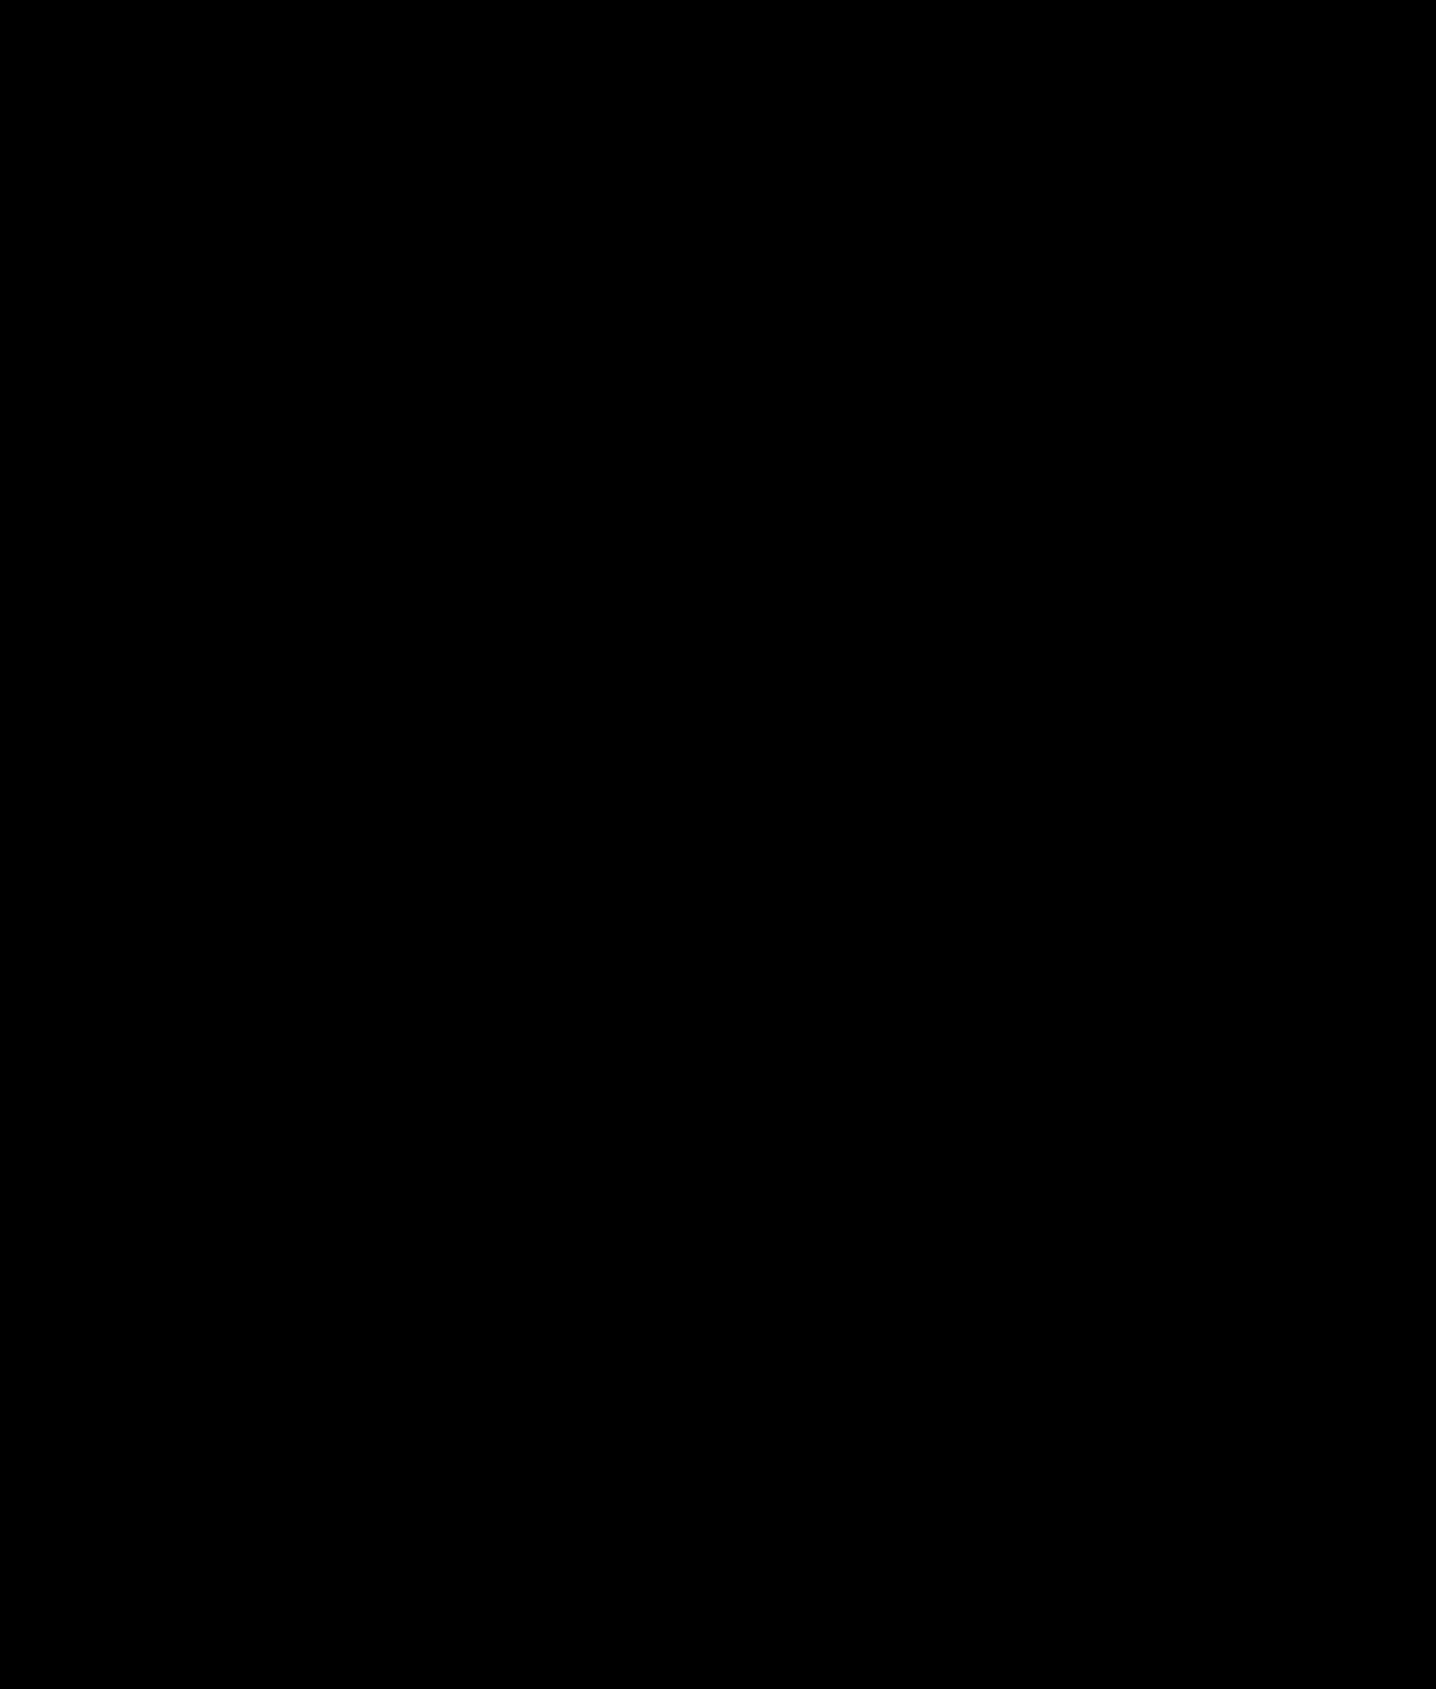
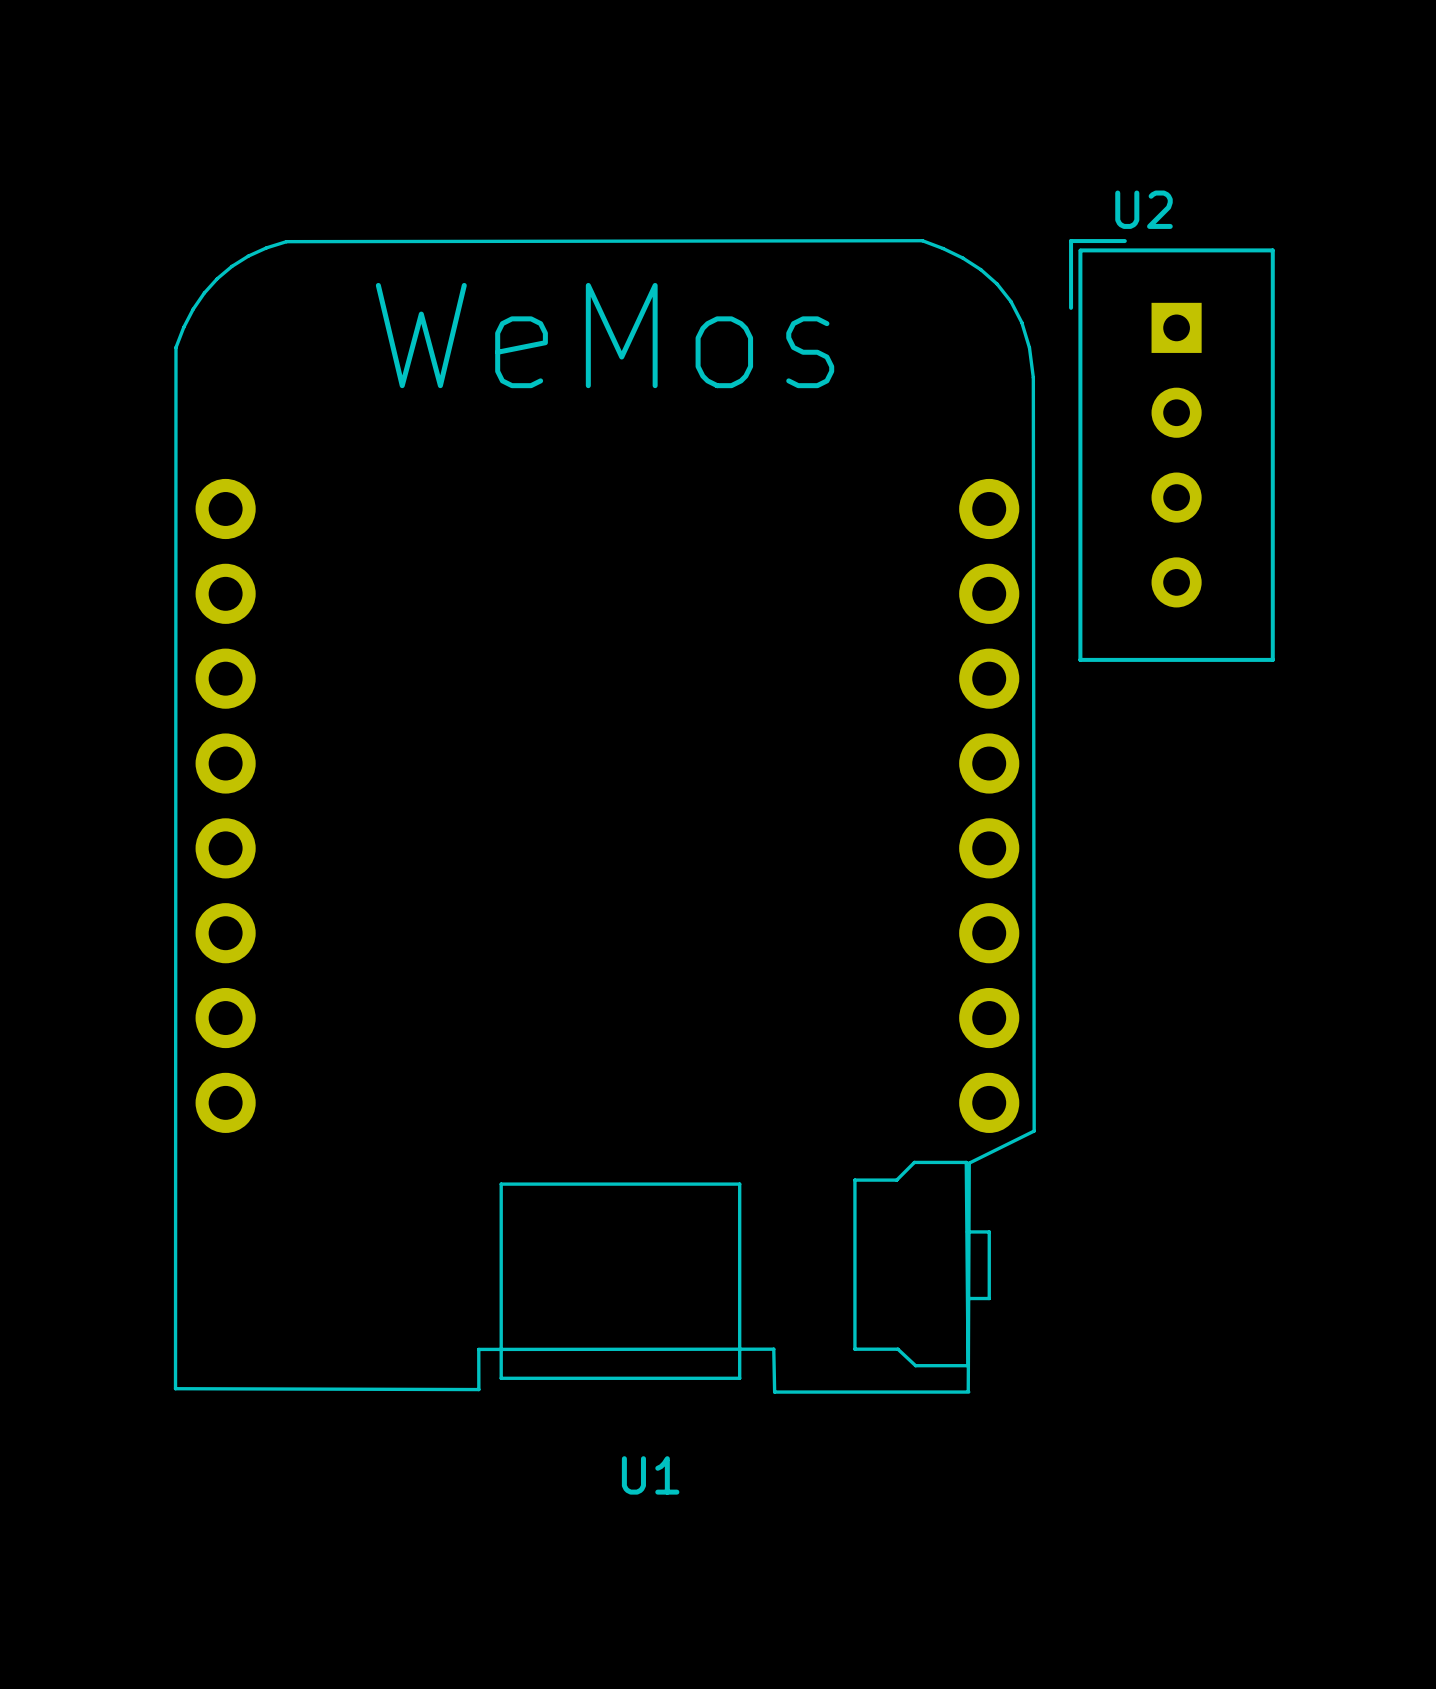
U2: none -> (1171, 450)
U1: none -> (604, 816)

